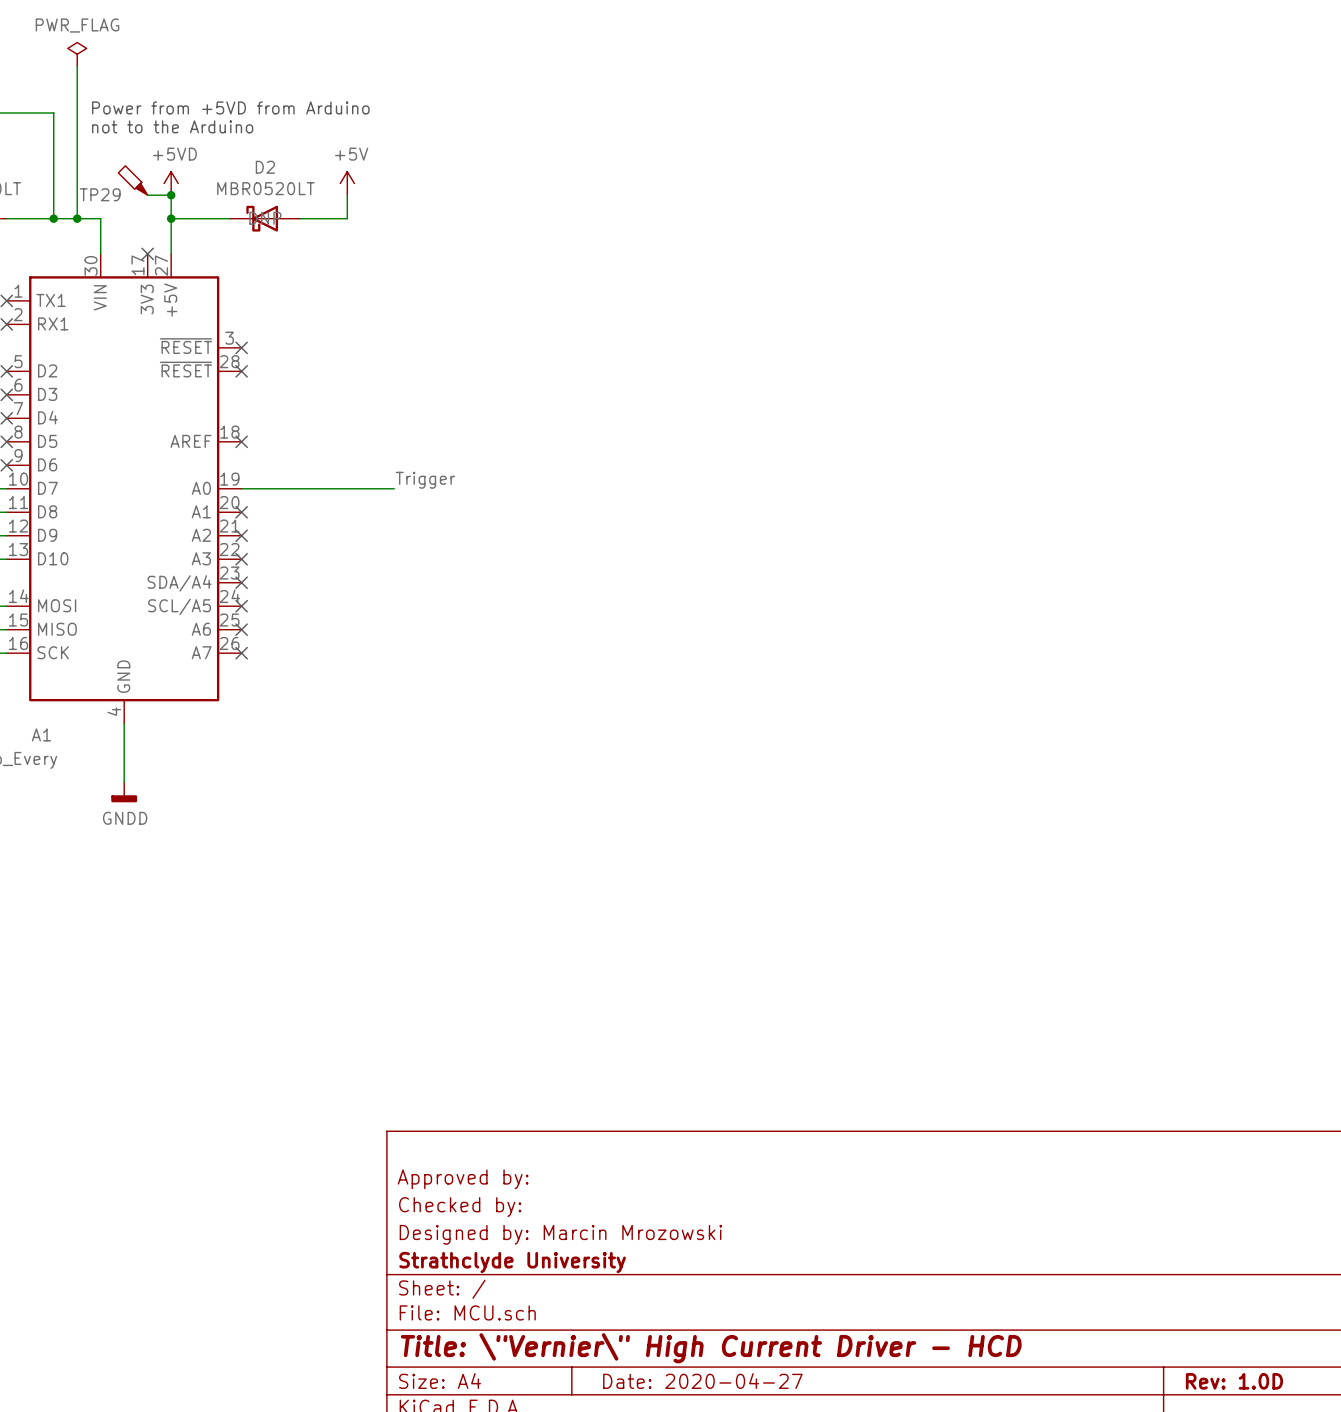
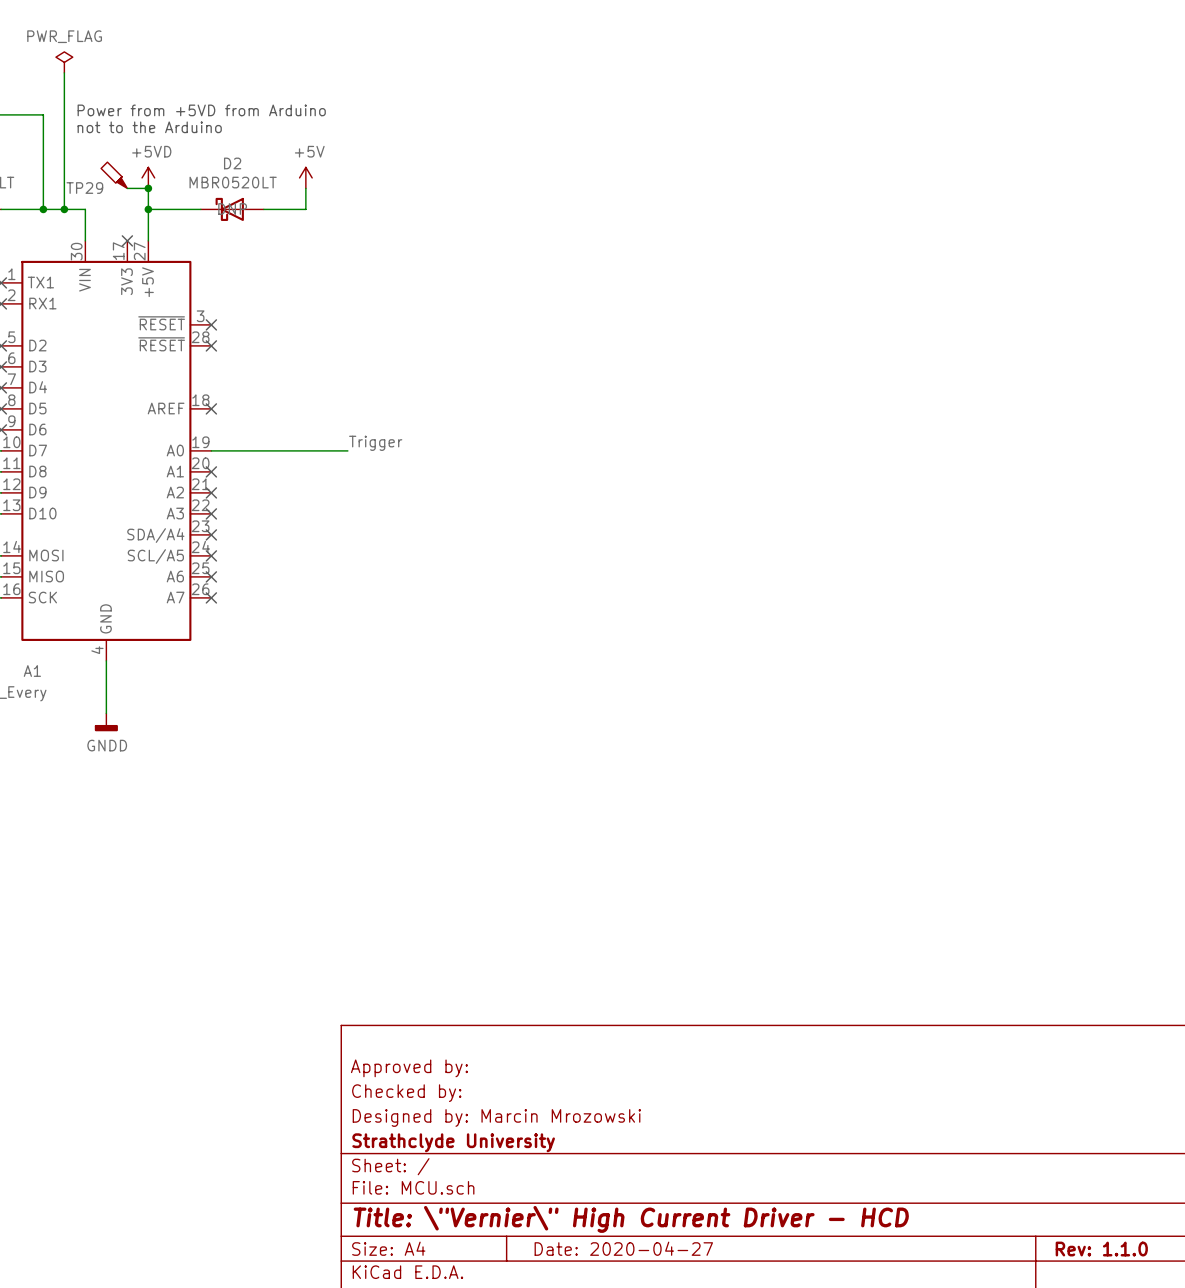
title block: Rev: 1.0D (1234, 1381) -> Rev: 1.1.0 (1101, 1249)

